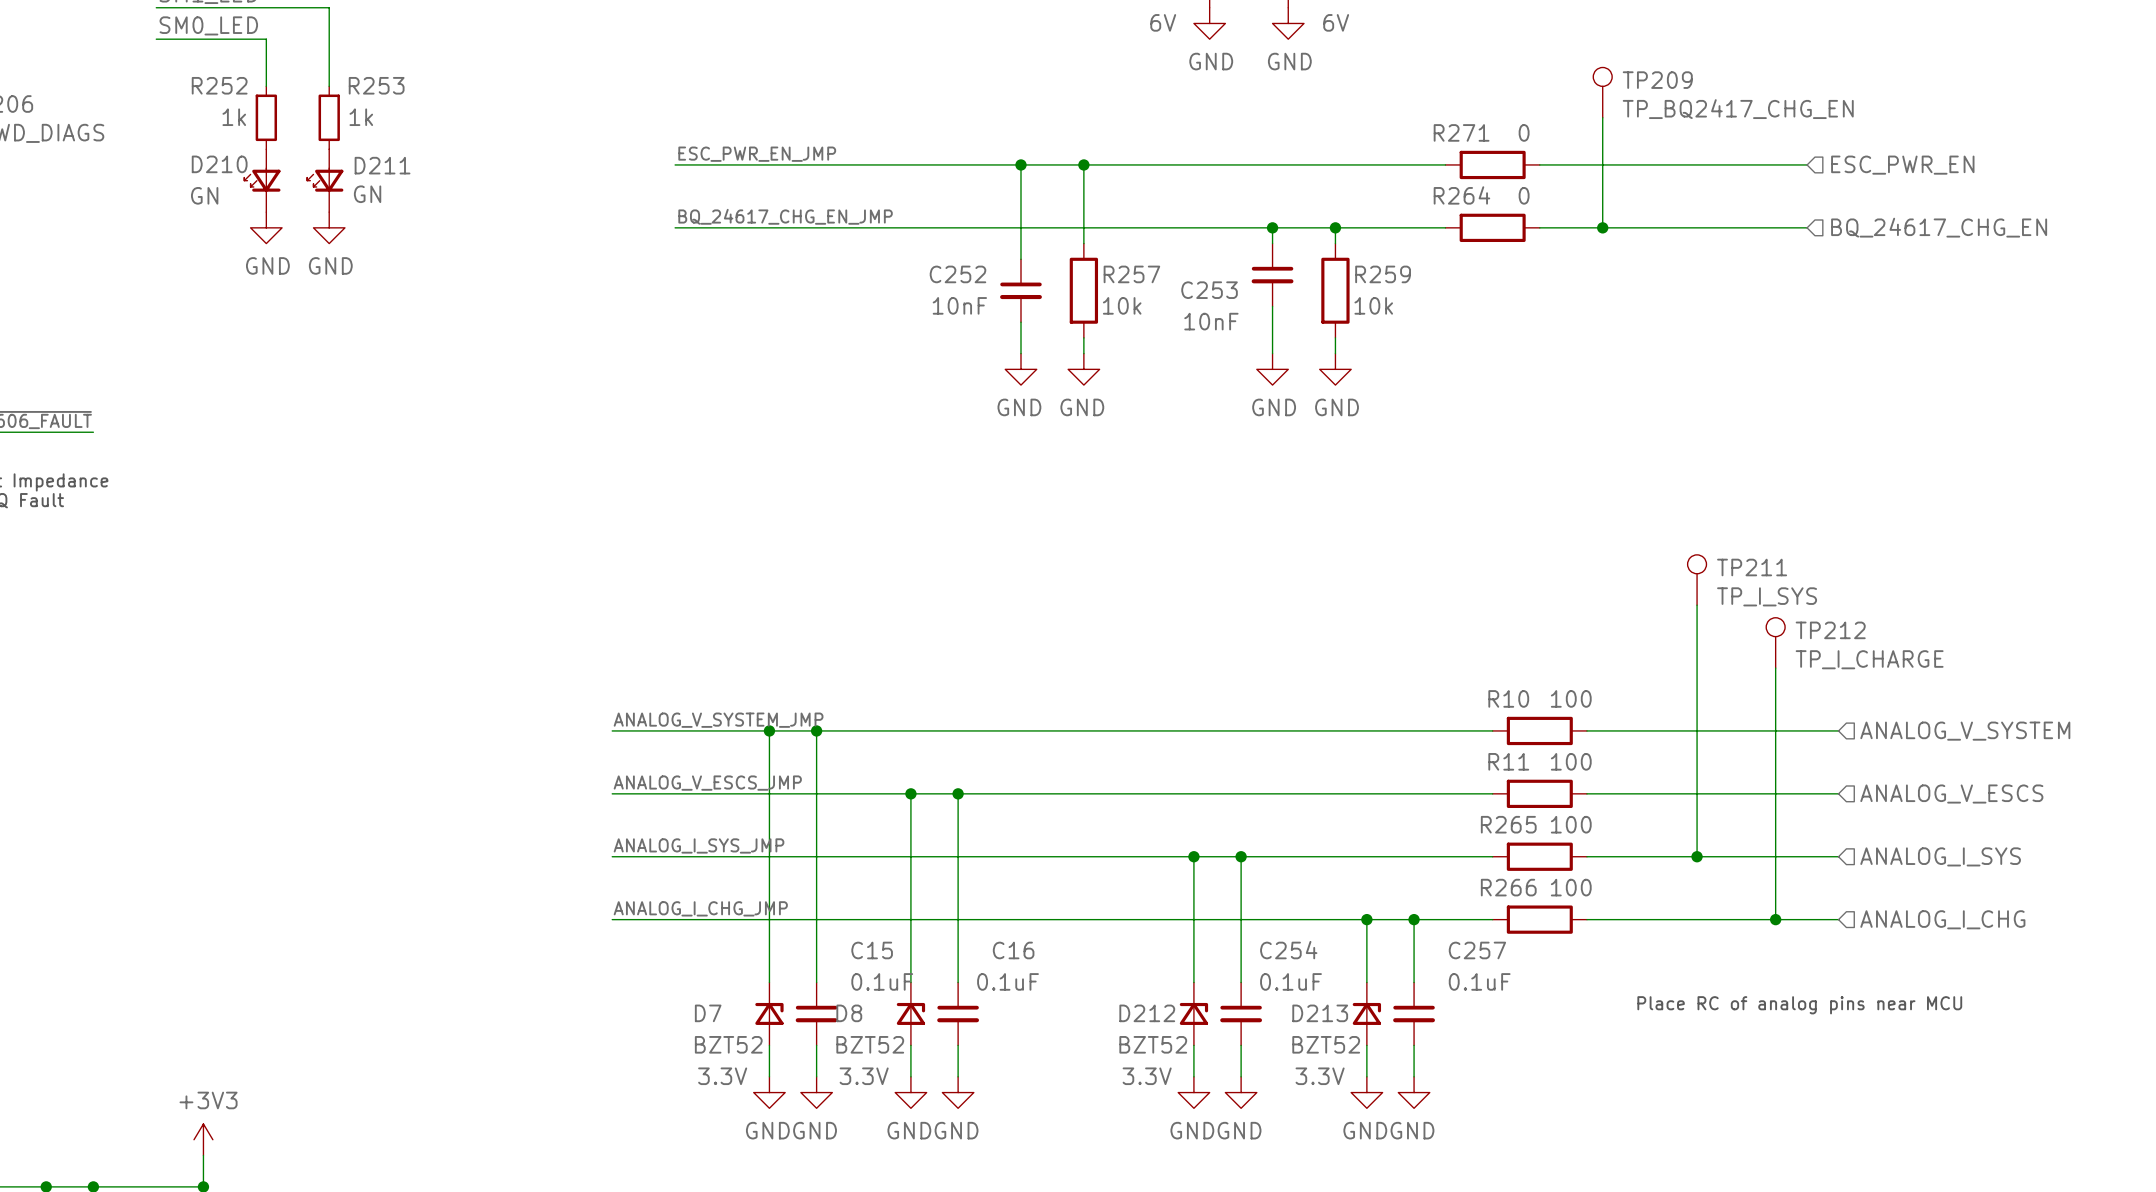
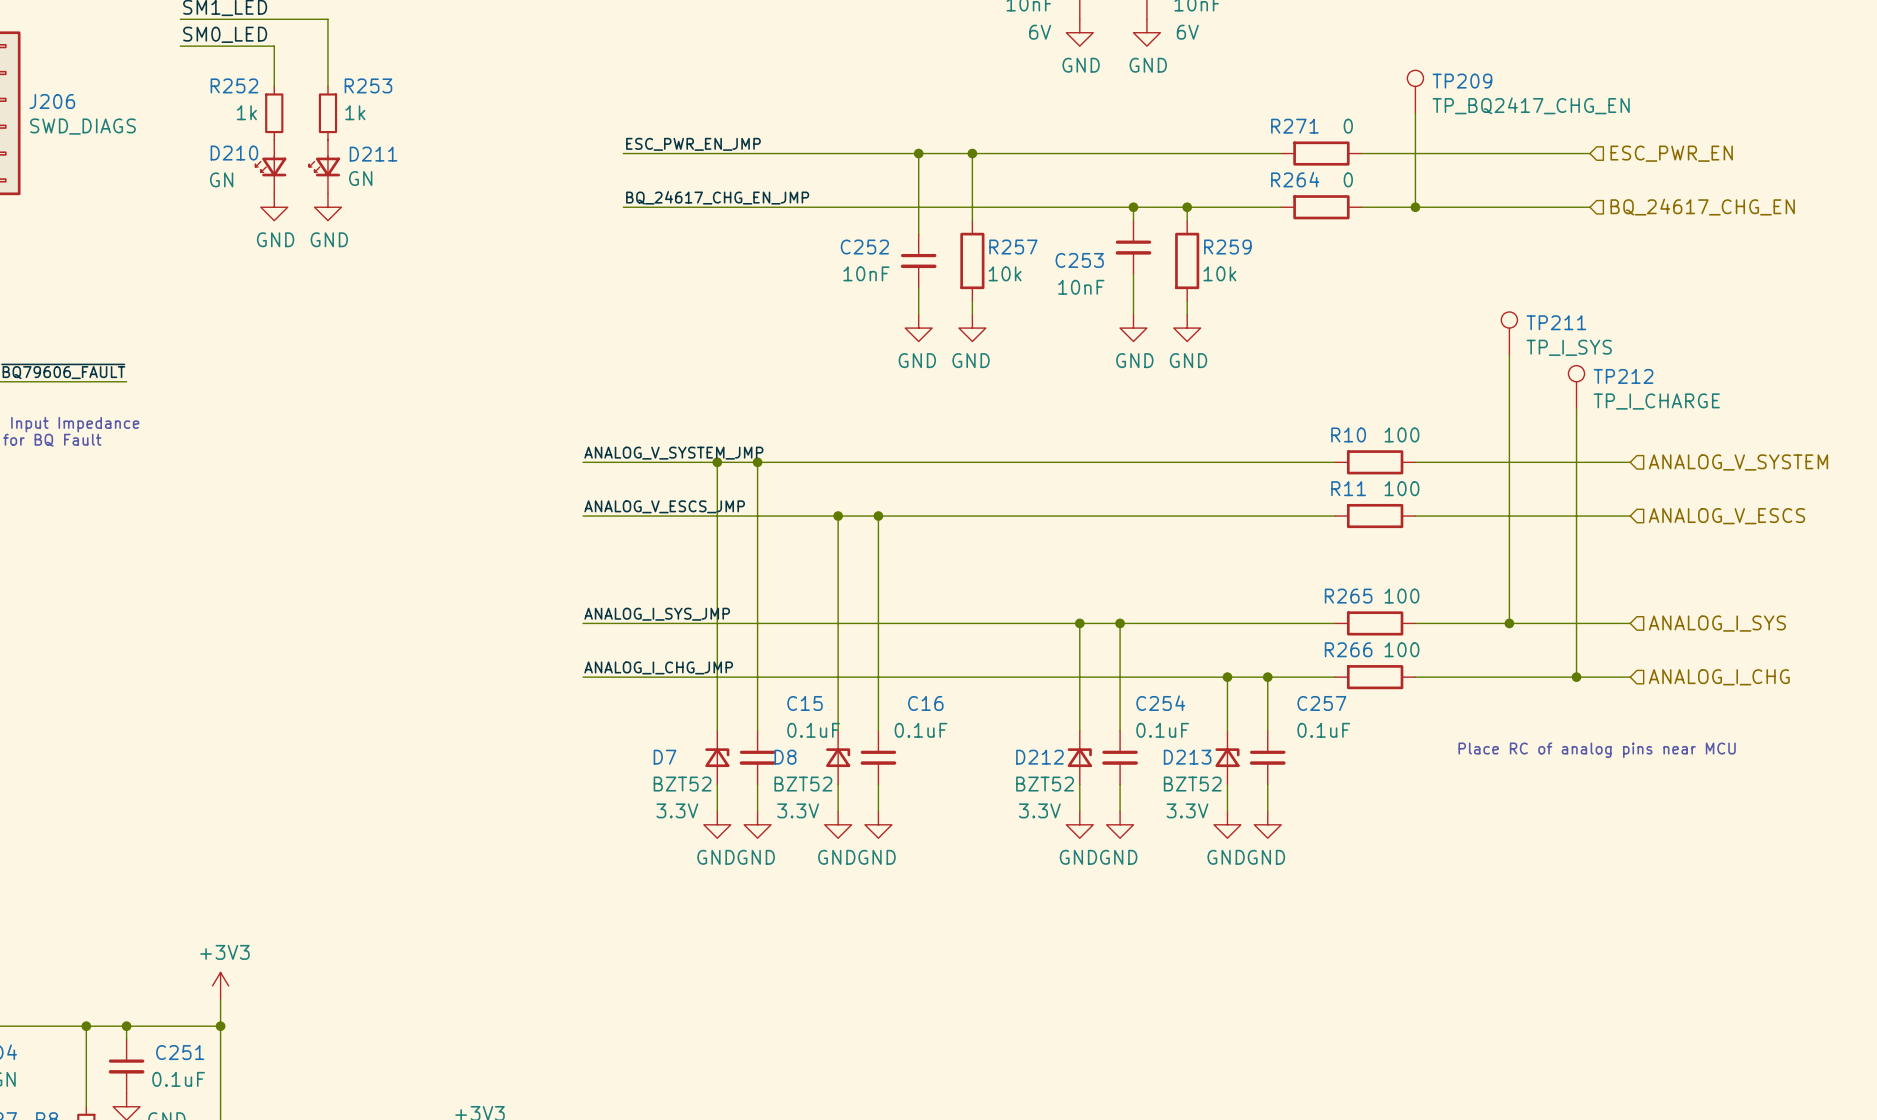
wire: none -> (1509, 354) (1509, 623)
wire: none -> (1576, 408) (1576, 677)
wire: none -> (717, 462) (717, 730)
junction: none -> (717, 462)
wire: none -> (757, 462) (757, 730)
junction: none -> (757, 462)
TP211 position: (1697, 580) -> (1509, 333)
junction: none -> (838, 516)
junction: none -> (878, 516)
wire: (1697, 605) (1697, 856) -> none
TP212 position: (1775, 642) -> (1576, 387)
wire: (1775, 668) (1775, 919) -> none
junction: none -> (1079, 623)
junction: none -> (1120, 623)
junction: none -> (1509, 623)
label position: ANALOG_V_SYSTEM_JMP (718, 720) -> ANALOG_V_SYSTEM_JMP (673, 453)
wire: (612, 730) (1492, 730) -> (583, 516) (1334, 516)
wire: (769, 730) (769, 982) -> (838, 516) (838, 730)
junction: (769, 730) -> none
wire: (816, 730) (816, 982) -> (878, 516) (878, 730)
junction: (816, 730) -> none
R10 position: (1539, 730) -> (1375, 462)
wire: (1586, 730) (1838, 730) -> (1415, 516) (1630, 516)
hierarchical label position: ANALOG_V_SYSTEM (1965, 731) -> ANALOG_V_SYSTEM (1738, 462)
junction: none -> (1227, 677)
junction: none -> (1267, 677)
junction: none -> (1576, 677)
label position: ANALOG_V_ESCS_JMP (707, 783) -> ANALOG_V_ESCS_JMP (664, 506)
wire: (612, 793) (1492, 793) -> (583, 462) (1334, 462)
wire: (910, 793) (910, 982) -> none
junction: (910, 793) -> none
wire: (958, 793) (958, 982) -> none
junction: (958, 793) -> none
R11 position: (1539, 793) -> (1375, 516)
wire: (1586, 793) (1838, 793) -> (1415, 462) (1630, 462)
hierarchical label position: ANALOG_V_ESCS (1951, 794) -> ANALOG_V_ESCS (1726, 516)
label position: ANALOG_I_SYS_JMP (699, 845) -> ANALOG_I_SYS_JMP (657, 614)
wire: (612, 856) (1492, 856) -> (583, 623) (1334, 623)
wire: (1193, 856) (1193, 982) -> (1079, 623) (1079, 730)
junction: (1193, 856) -> none
wire: (1241, 856) (1241, 982) -> (1120, 623) (1120, 730)
junction: (1241, 856) -> none
R265 position: (1539, 856) -> (1375, 623)
wire: (1586, 856) (1838, 856) -> (1415, 623) (1630, 623)
junction: (1697, 856) -> none
hierarchical label position: ANALOG_I_SYS (1940, 856) -> ANALOG_I_SYS (1717, 623)
label position: ANALOG_I_CHG_JMP (700, 908) -> ANALOG_I_CHG_JMP (658, 667)
wire: (612, 919) (1492, 919) -> (583, 677) (1334, 677)
wire: (1366, 919) (1366, 982) -> (1227, 677) (1227, 730)
junction: (1366, 919) -> none
wire: (1414, 919) (1414, 982) -> (1267, 677) (1267, 730)
junction: (1414, 919) -> none
R266 position: (1539, 919) -> (1375, 677)
wire: (1586, 919) (1838, 919) -> (1415, 677) (1630, 677)
junction: (1775, 919) -> none
hierarchical label position: ANALOG_I_CHG (1942, 919) -> ANALOG_I_CHG (1719, 677)
power symbol: none -> GND (717, 824)
power symbol: none -> GND (757, 824)
power symbol: none -> GND (838, 824)
power symbol: none -> GND (878, 824)
power symbol: none -> GND (1079, 824)
power symbol: none -> GND (1120, 824)
power symbol: none -> GND (1227, 824)
power symbol: none -> GND (1267, 824)
text position: Place RC of analog pins near MCU (1799, 1005) -> Place RC of analog pins near MCU (1597, 750)
D7 position: (769, 1013) -> (717, 757)
C15 position: (816, 1013) -> (757, 757)
D8 position: (910, 1013) -> (838, 757)
C16 position: (958, 1013) -> (878, 757)
D212 position: (1193, 1013) -> (1079, 757)
C254 position: (1241, 1013) -> (1120, 757)
D213 position: (1366, 1013) -> (1227, 757)
C257 position: (1414, 1013) -> (1267, 757)
wire: (769, 1045) (769, 1076) -> (717, 784) (717, 811)
wire: (816, 1045) (816, 1076) -> (757, 784) (757, 811)
wire: (910, 1045) (910, 1076) -> (838, 784) (838, 811)
wire: (958, 1045) (958, 1076) -> (878, 784) (878, 811)
wire: (1193, 1045) (1193, 1076) -> (1079, 784) (1079, 811)
wire: (1241, 1045) (1241, 1076) -> (1120, 784) (1120, 811)
wire: (1366, 1045) (1366, 1076) -> (1227, 784) (1227, 811)
wire: (1414, 1045) (1414, 1076) -> (1267, 784) (1267, 811)
power symbol: GND (769, 1092) -> none
power symbol: GND (816, 1092) -> none
power symbol: GND (910, 1092) -> none
power symbol: GND (958, 1092) -> none
power symbol: GND (1193, 1092) -> none
power symbol: GND (1241, 1092) -> none
power symbol: GND (1366, 1092) -> none
power symbol: GND (1414, 1092) -> none

